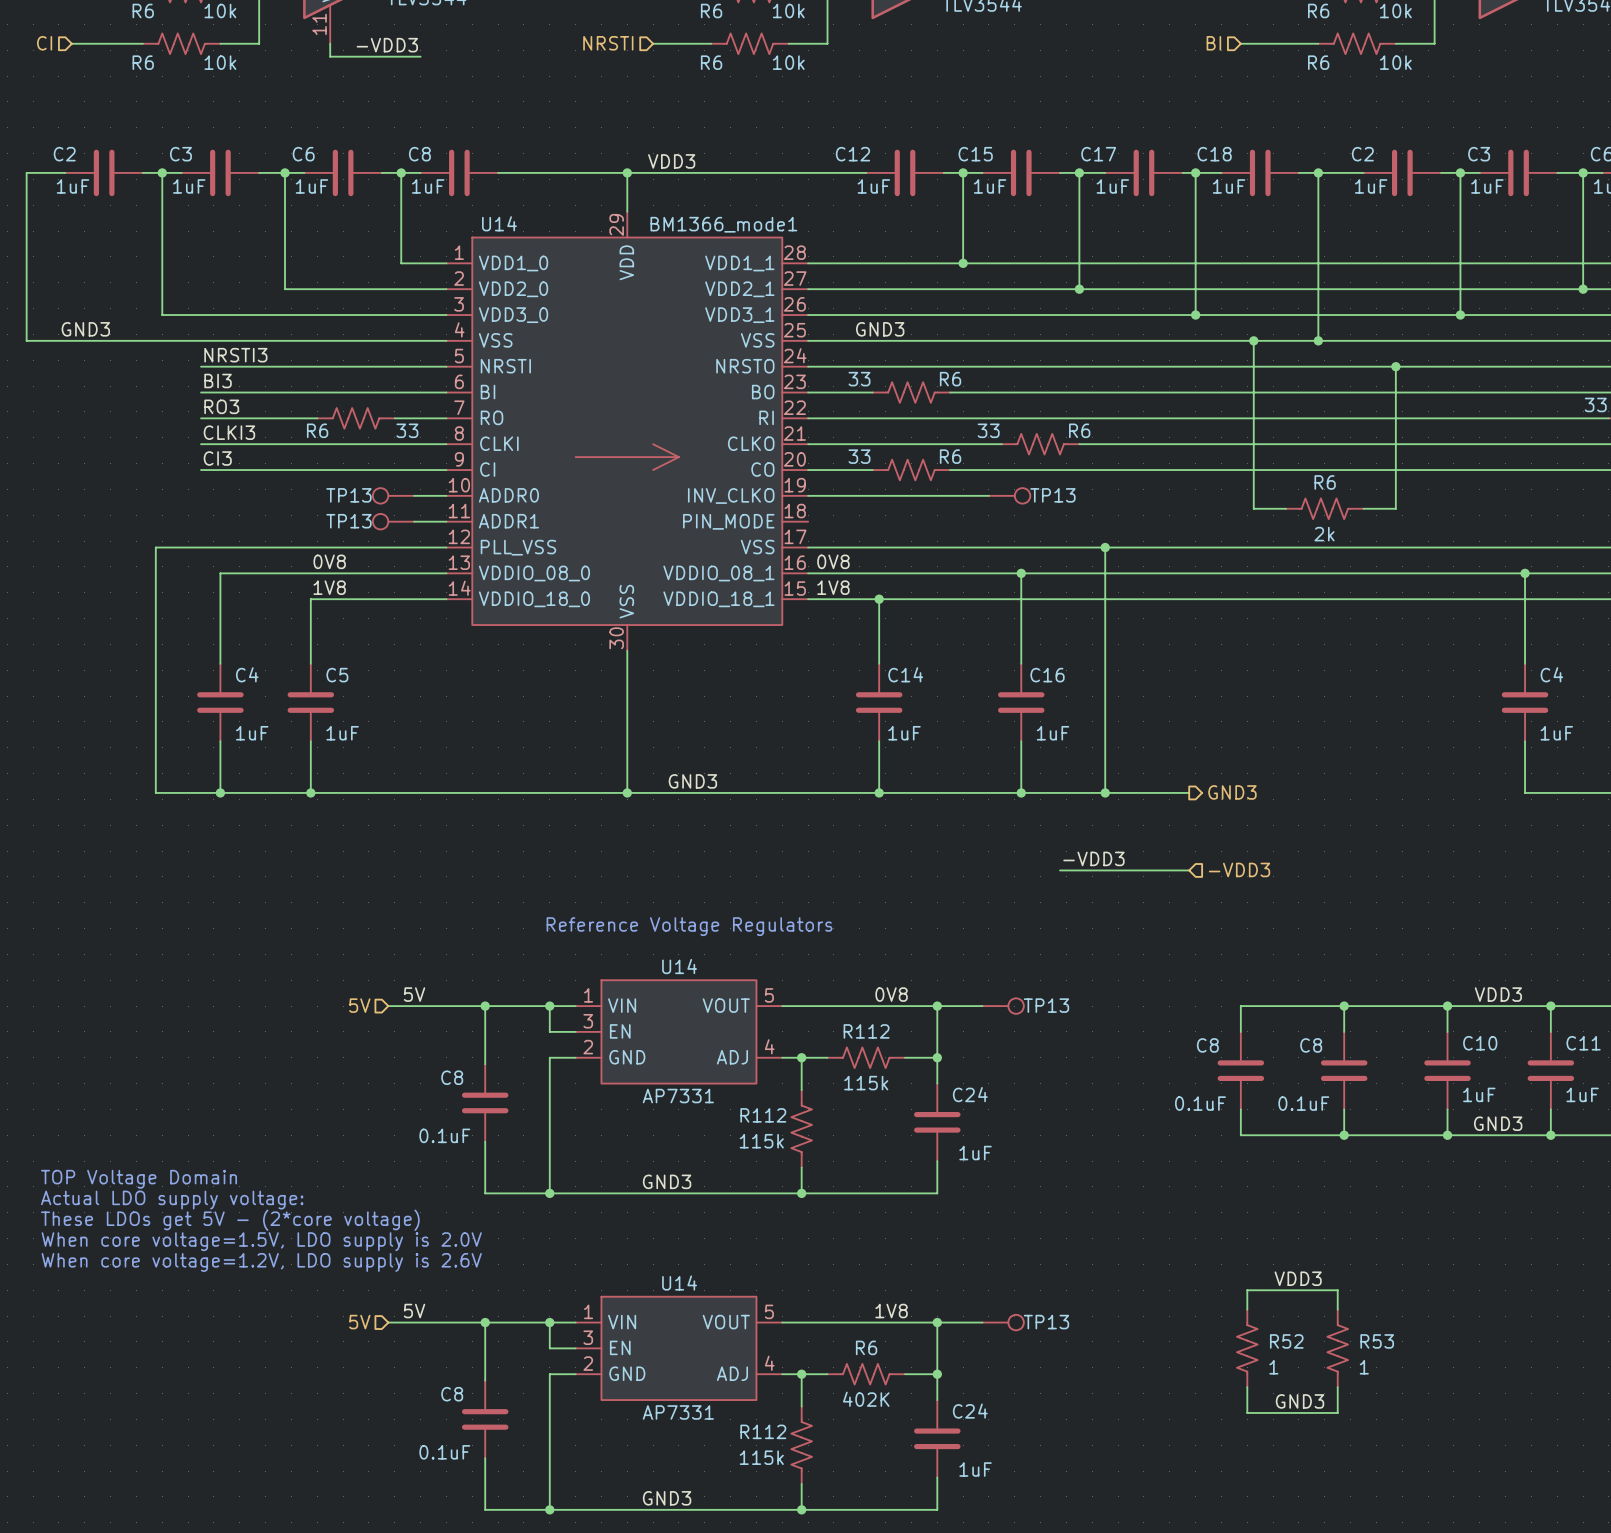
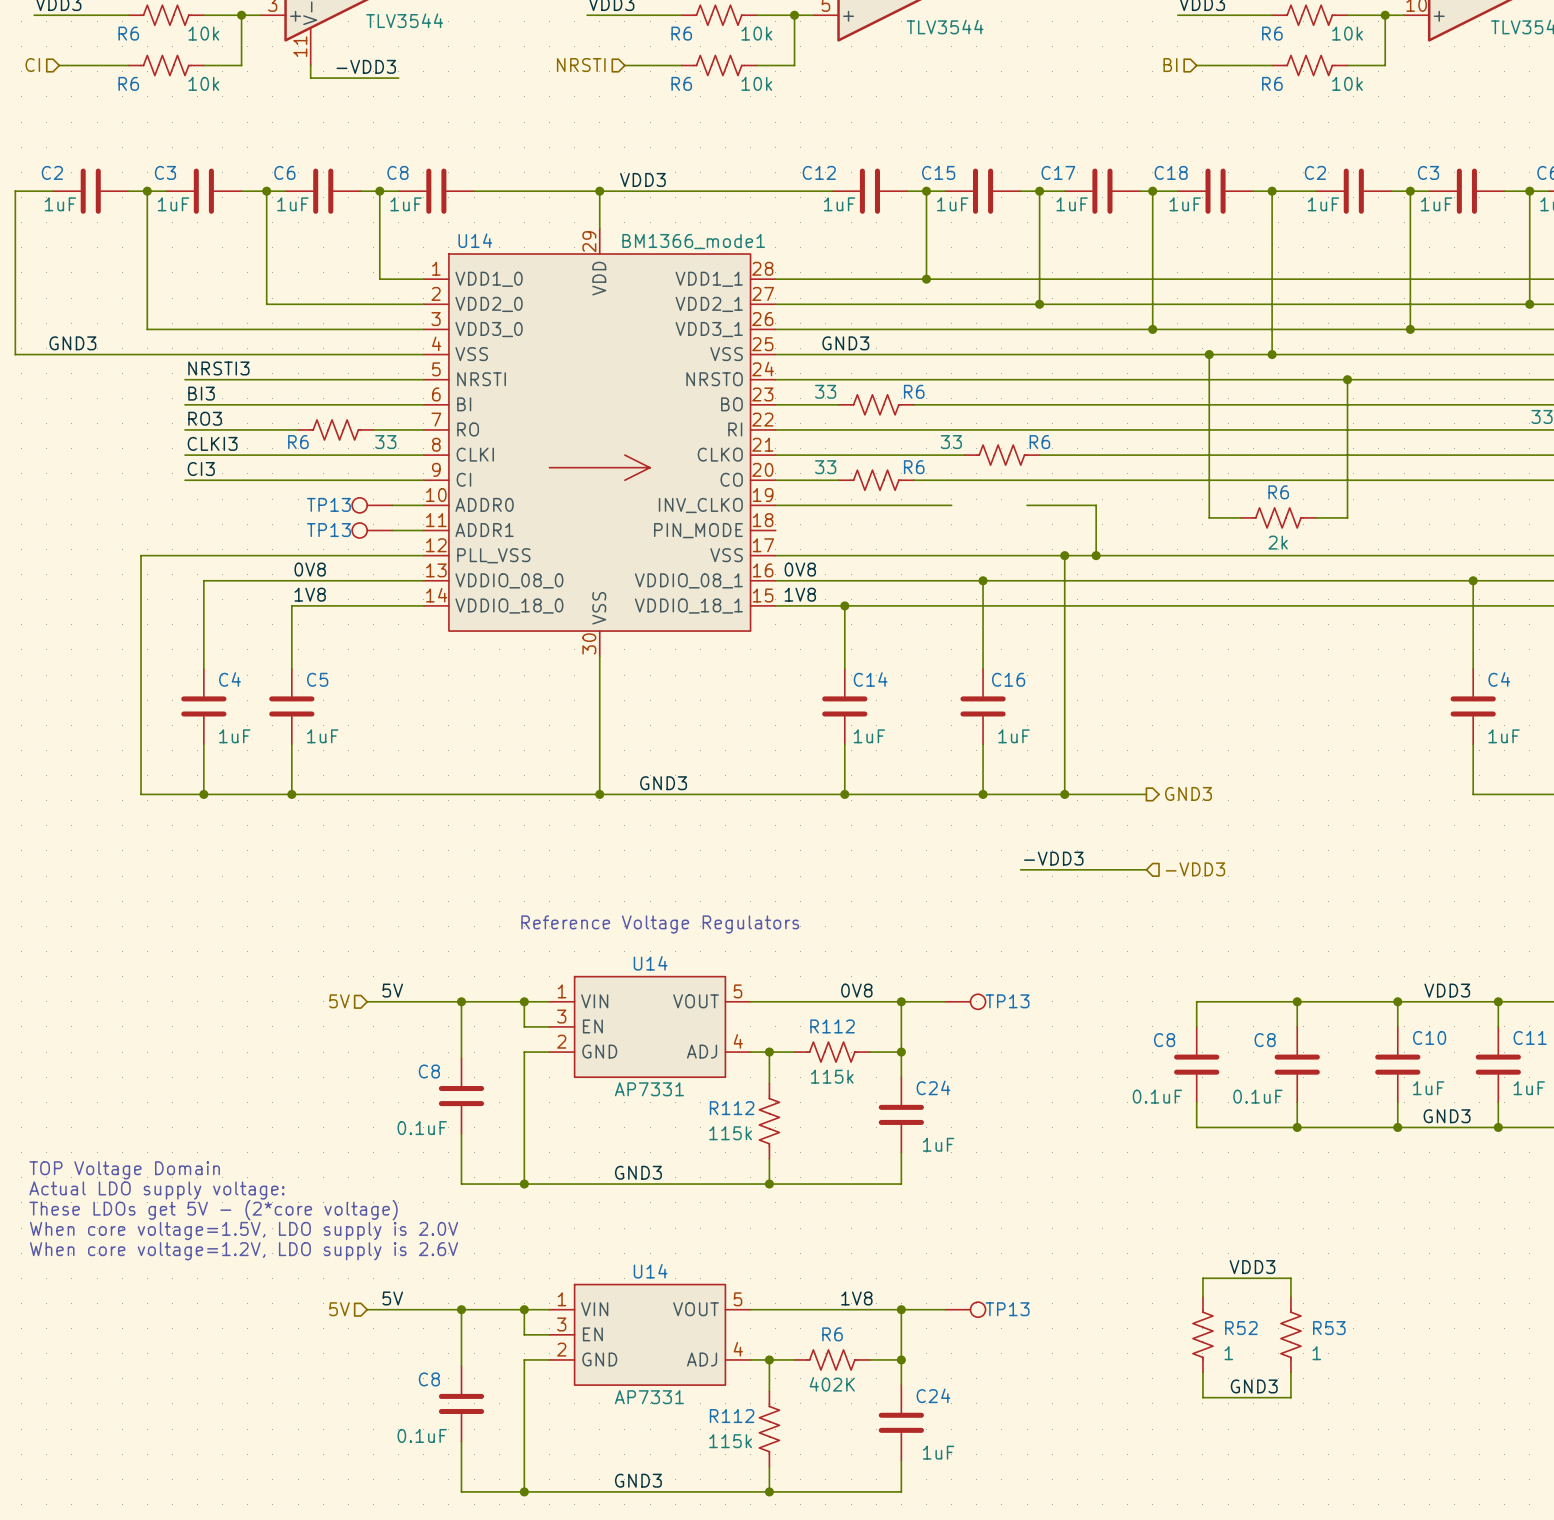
TP13: (1009, 495) -> none
wire: none -> (1027, 505) (1096, 505) (1096, 555)
junction: none -> (1096, 555)

